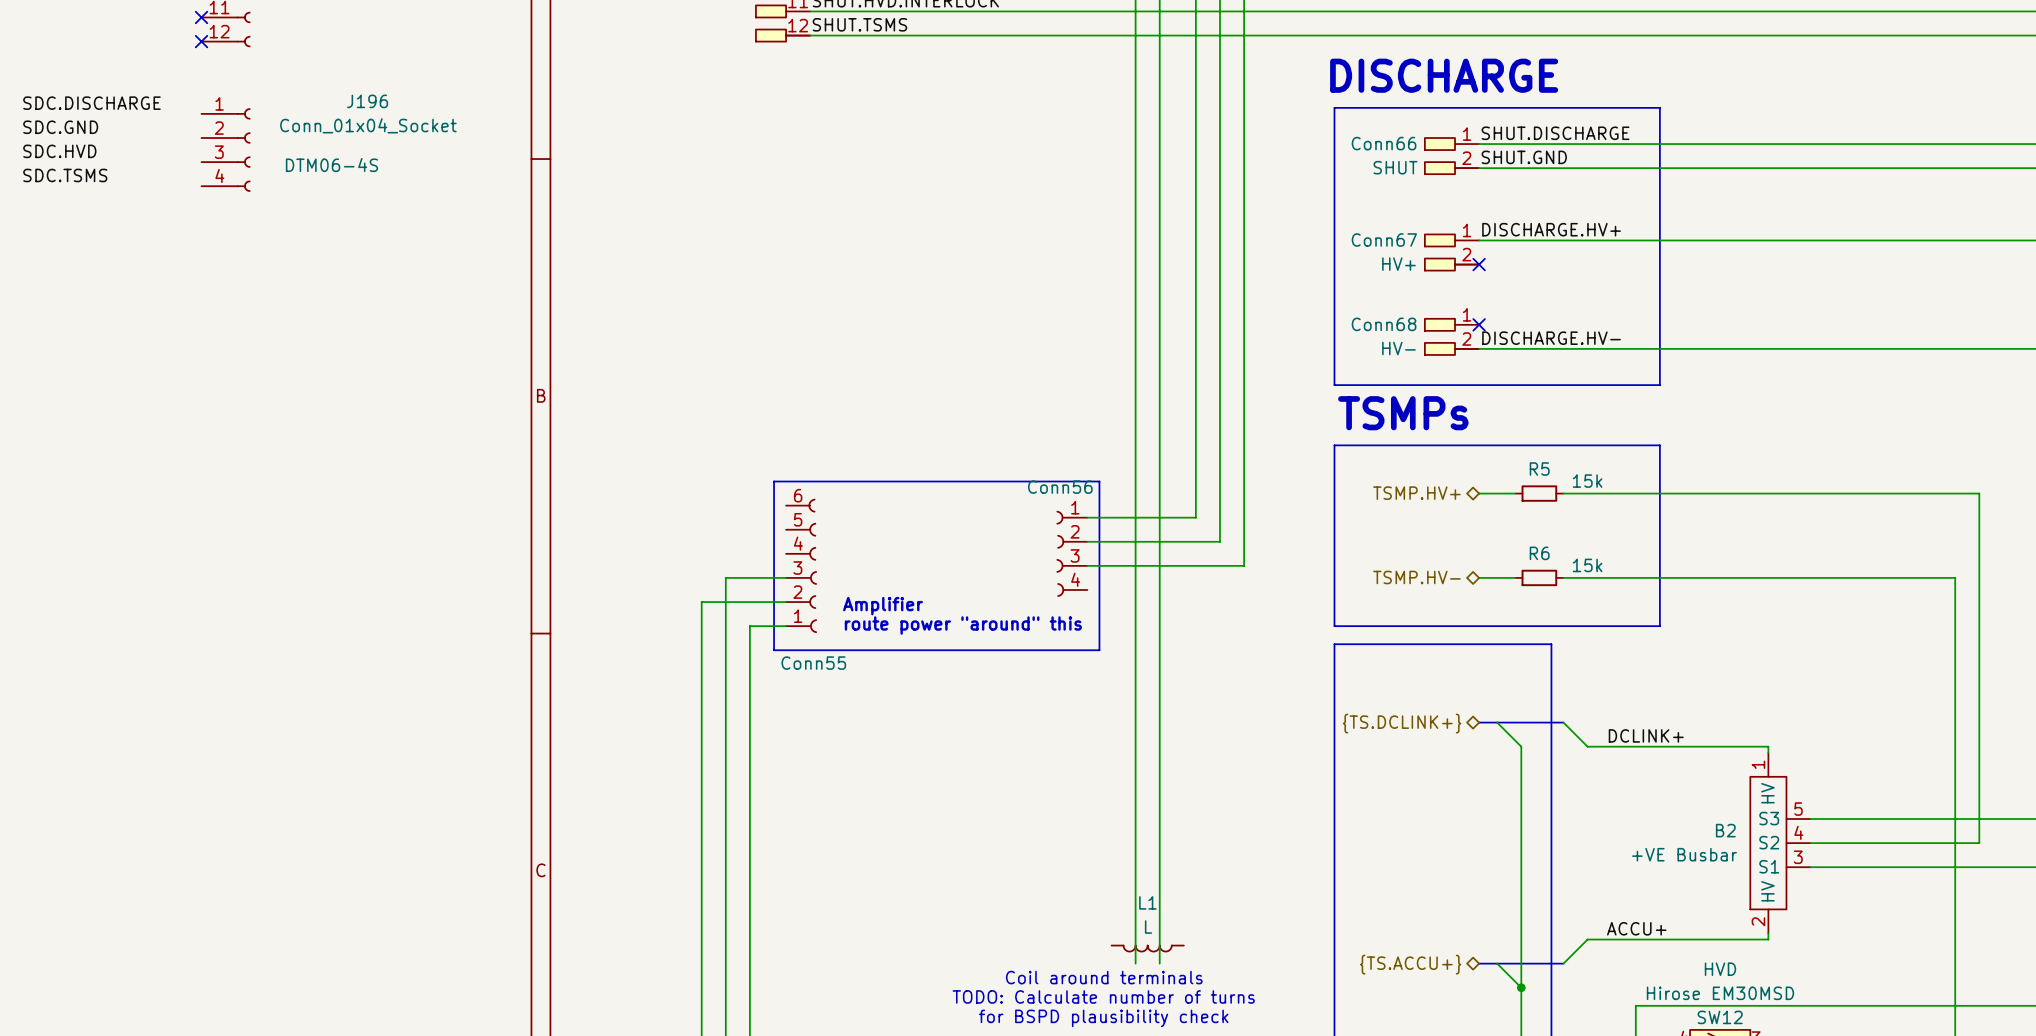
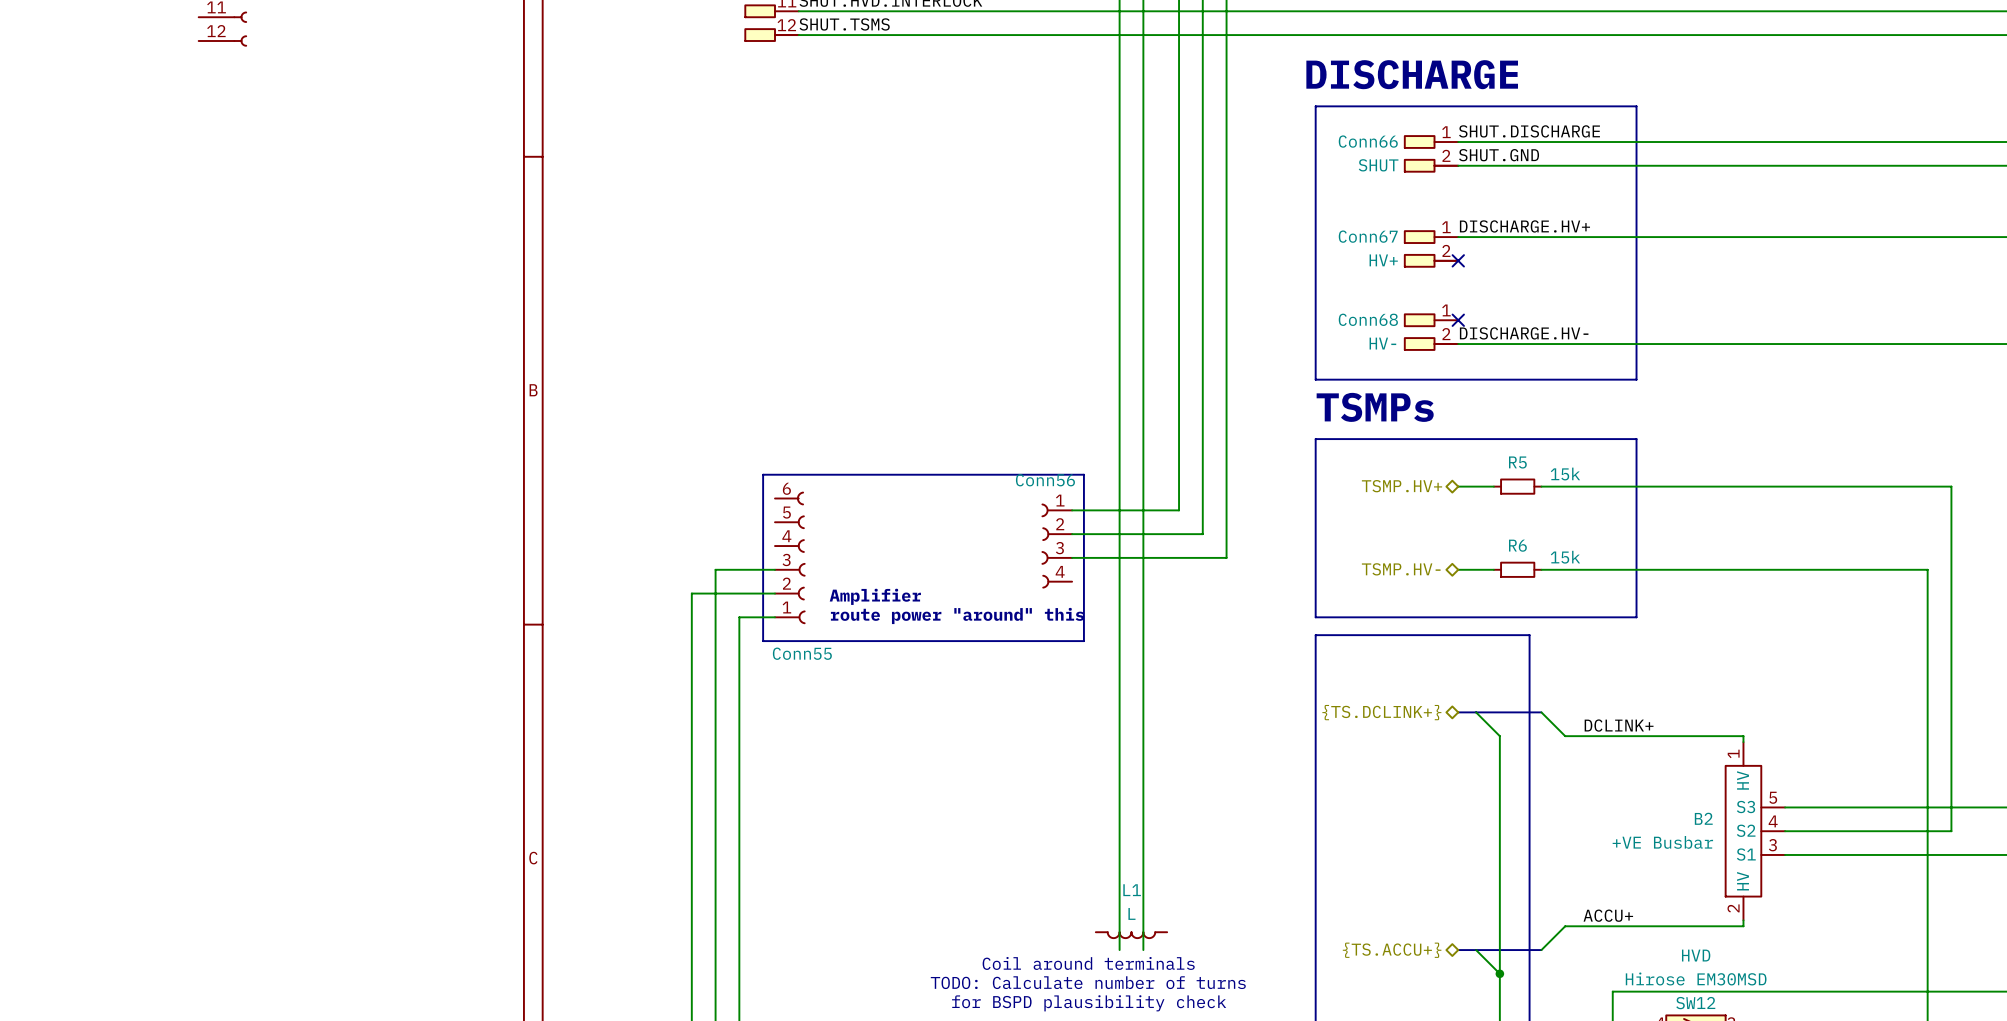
no-connect mark: (201, 17) -> none
no-connect mark: (201, 41) -> none
label: SDC.DISCHARGE (91, 103) -> none
label: SDC.GND (60, 127) -> none
J196: Conn_01x04_Socket (225, 150) -> none
label: SDC.HVD (59, 151) -> none
label: SDC.TSMS (65, 175) -> none

